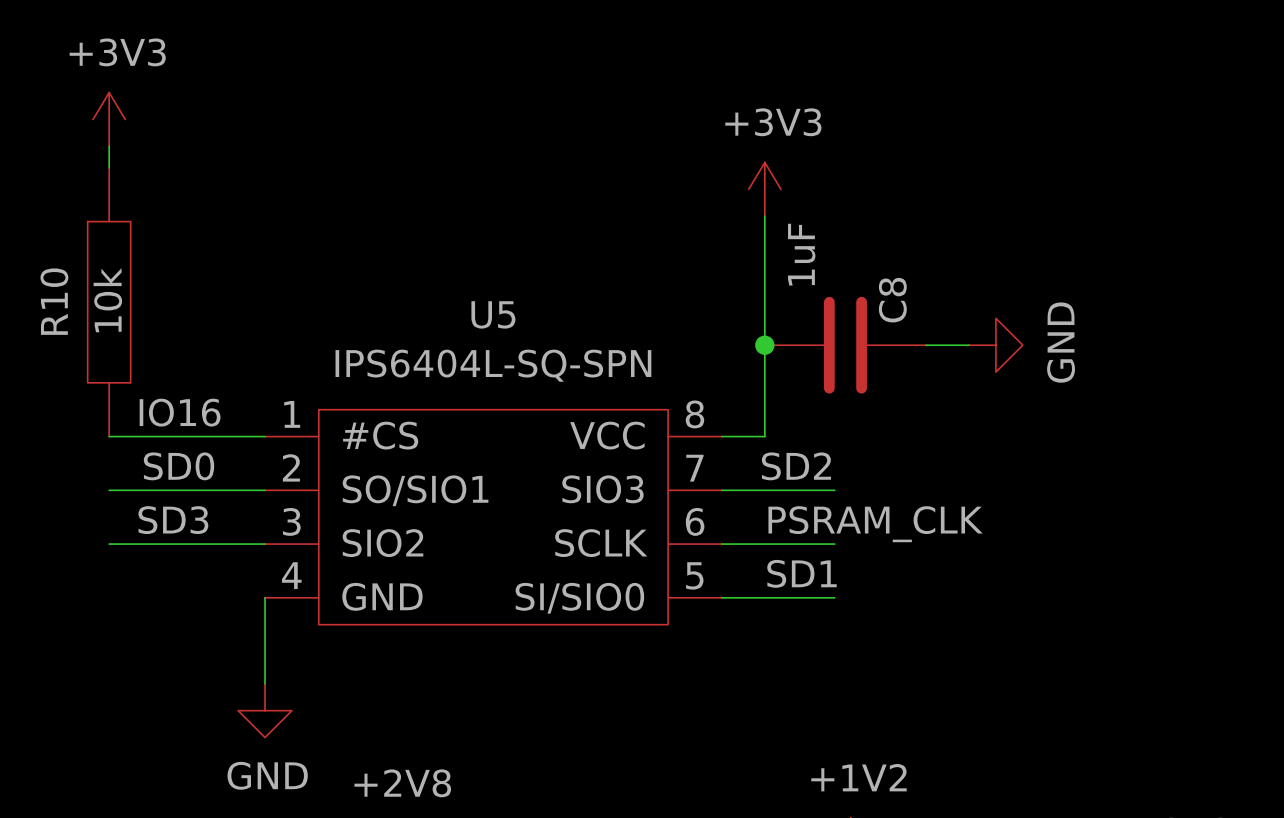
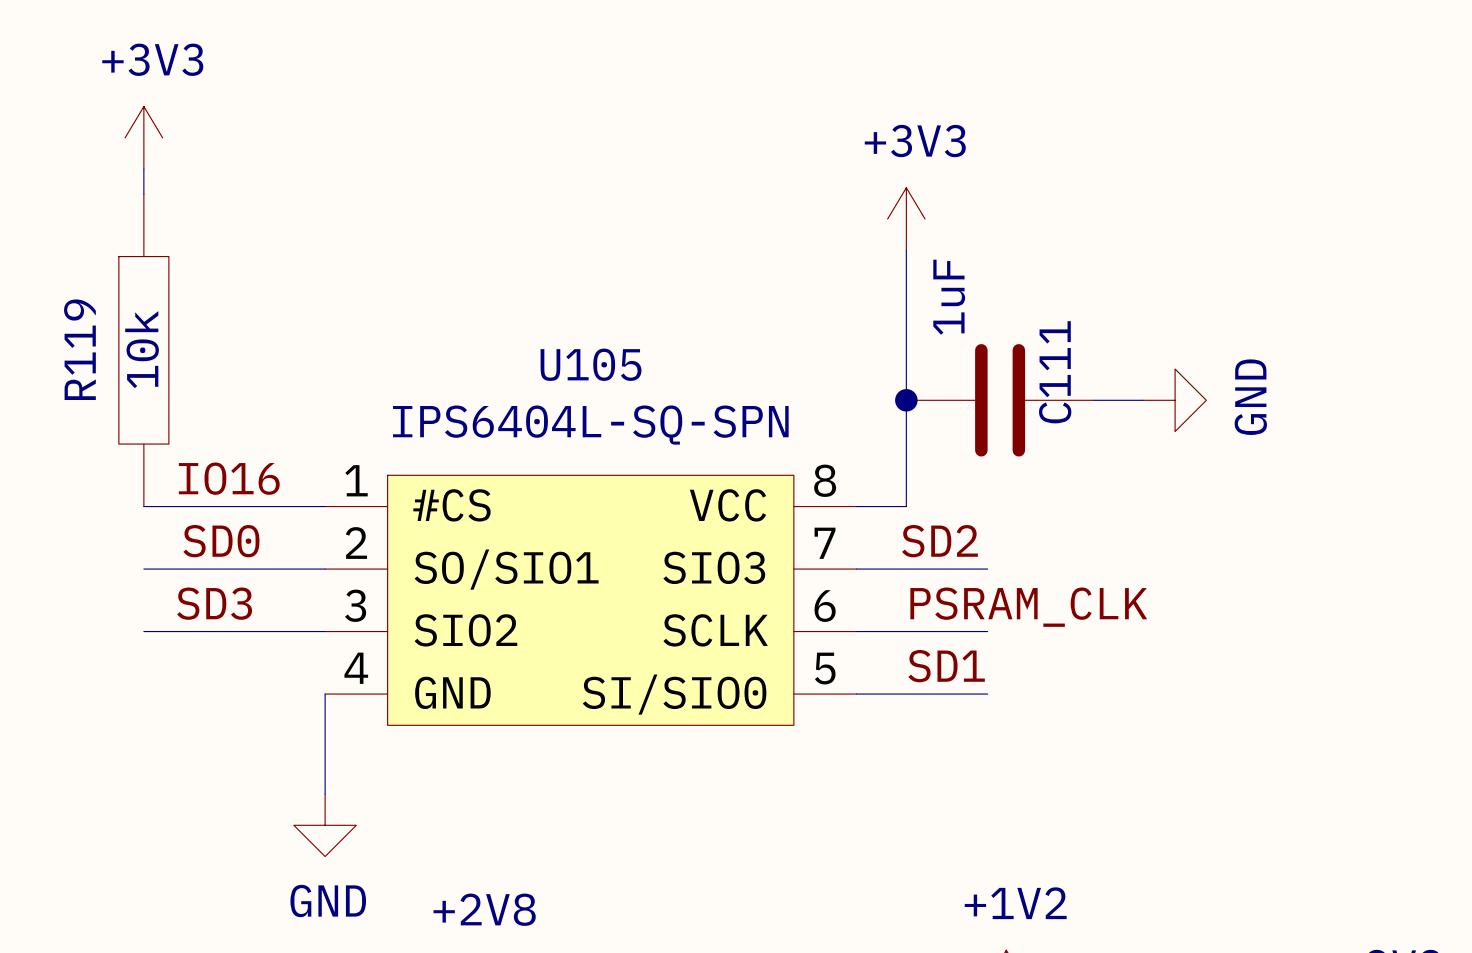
C8 name: C8 (892, 300) -> C111 (1055, 372)
R10 name: R10 (54, 301) -> R119 (79, 349)
U5 name: U5 (493, 314) -> U105 (591, 364)

